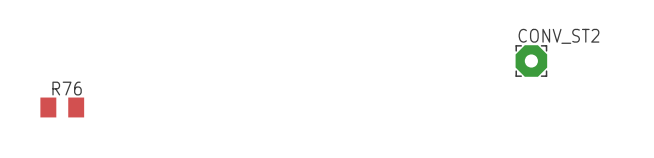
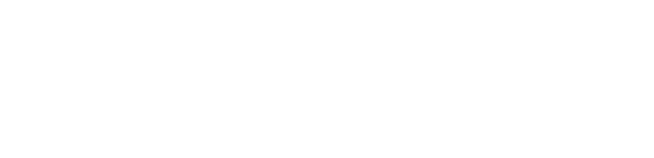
CONV_ST2: (531, 61) -> none
R76: (62, 107) -> none

